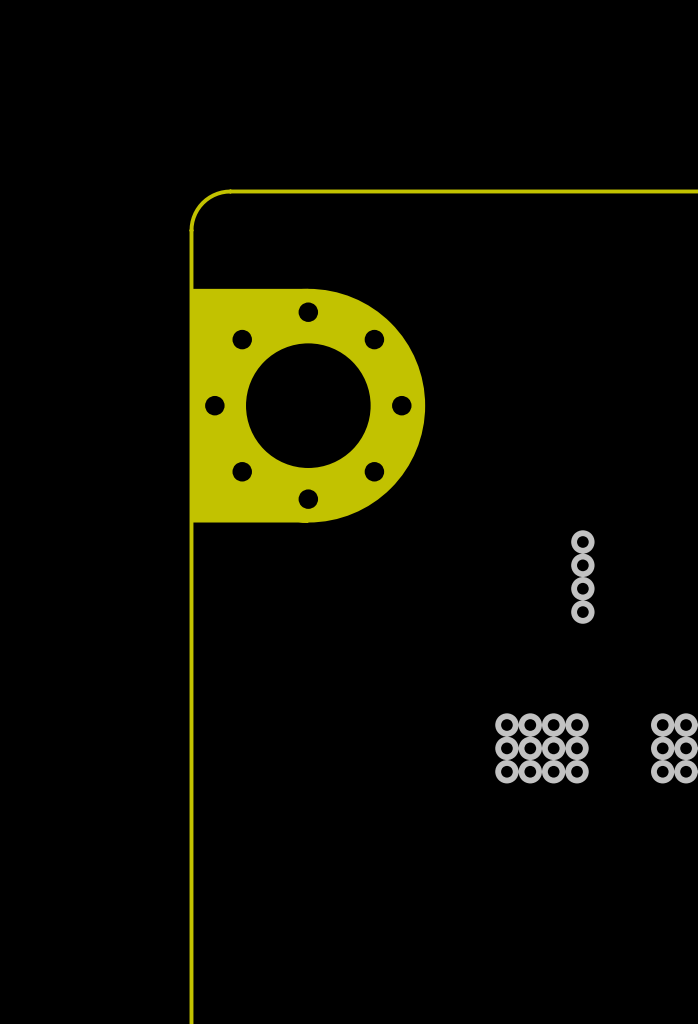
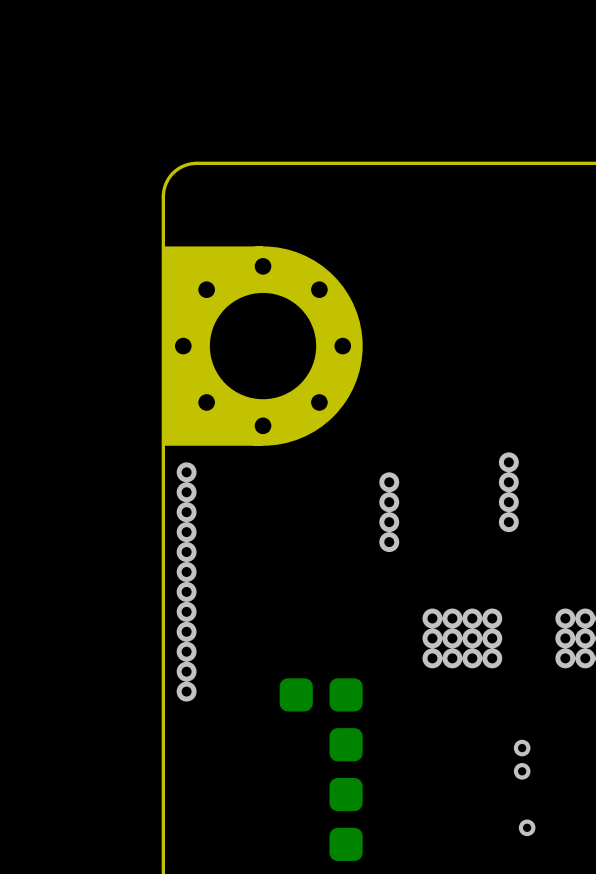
via: (582, 541) -> none
via: none -> (508, 462)
via: none -> (186, 472)
via: none -> (389, 482)
via: (582, 565) -> none
via: none -> (508, 482)
via: none -> (186, 492)
via: none -> (389, 502)
via: (582, 588) -> none
via: none -> (508, 502)
via: none -> (186, 512)
via: none -> (389, 522)
via: (582, 612) -> none
via: none -> (508, 522)
via: none -> (186, 532)
via: none -> (389, 542)
via: none -> (186, 552)
via: none -> (186, 571)
via: none -> (186, 591)
via: none -> (186, 611)
via: none -> (186, 631)
via: none -> (186, 651)
via: none -> (186, 671)
via: none -> (186, 691)
part: none -> (296, 694)
part: none -> (346, 694)
part: none -> (346, 744)
via: none -> (522, 748)
via: none -> (522, 771)
part: none -> (346, 794)
via: none -> (527, 827)
part: none -> (346, 844)

